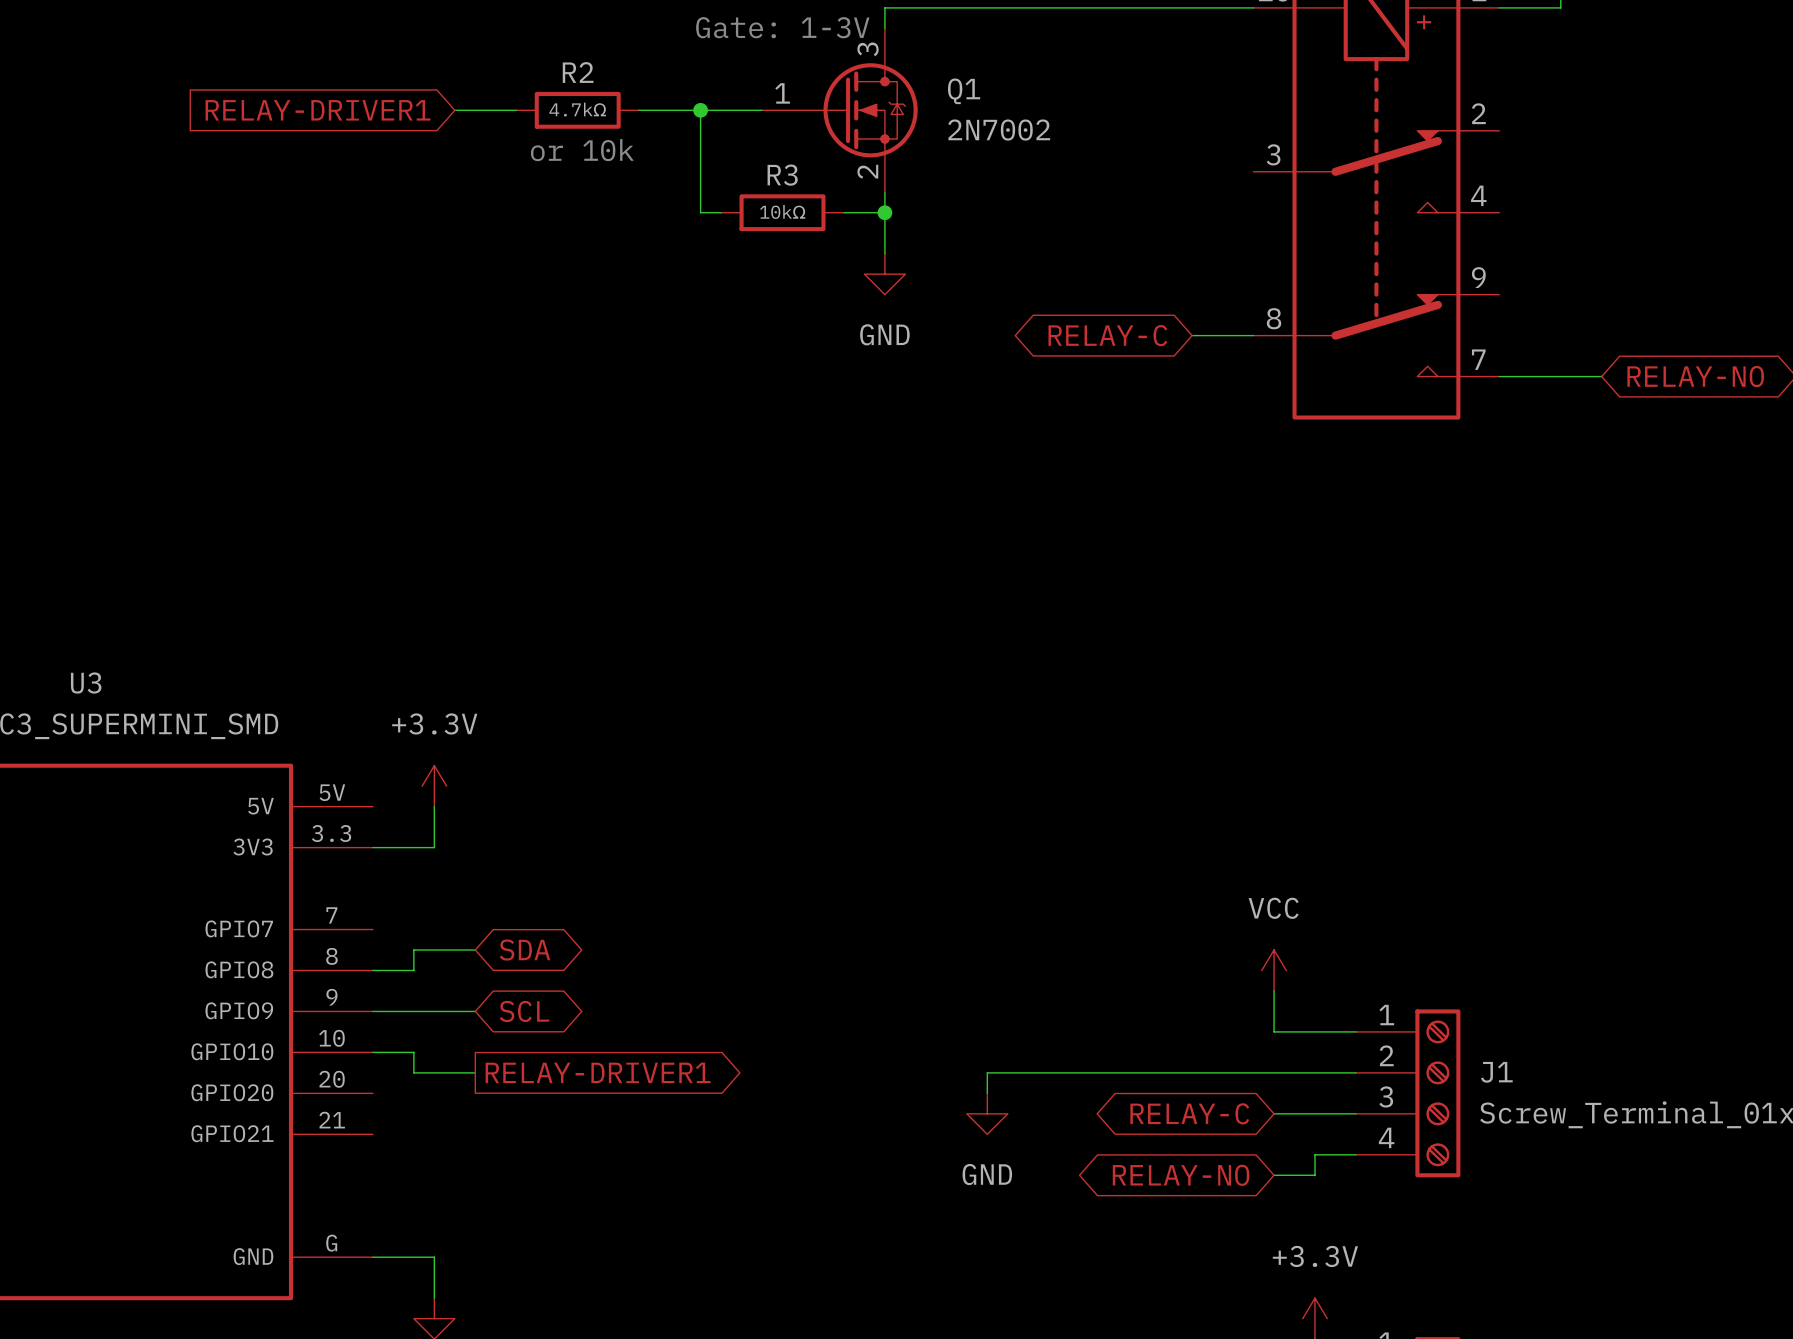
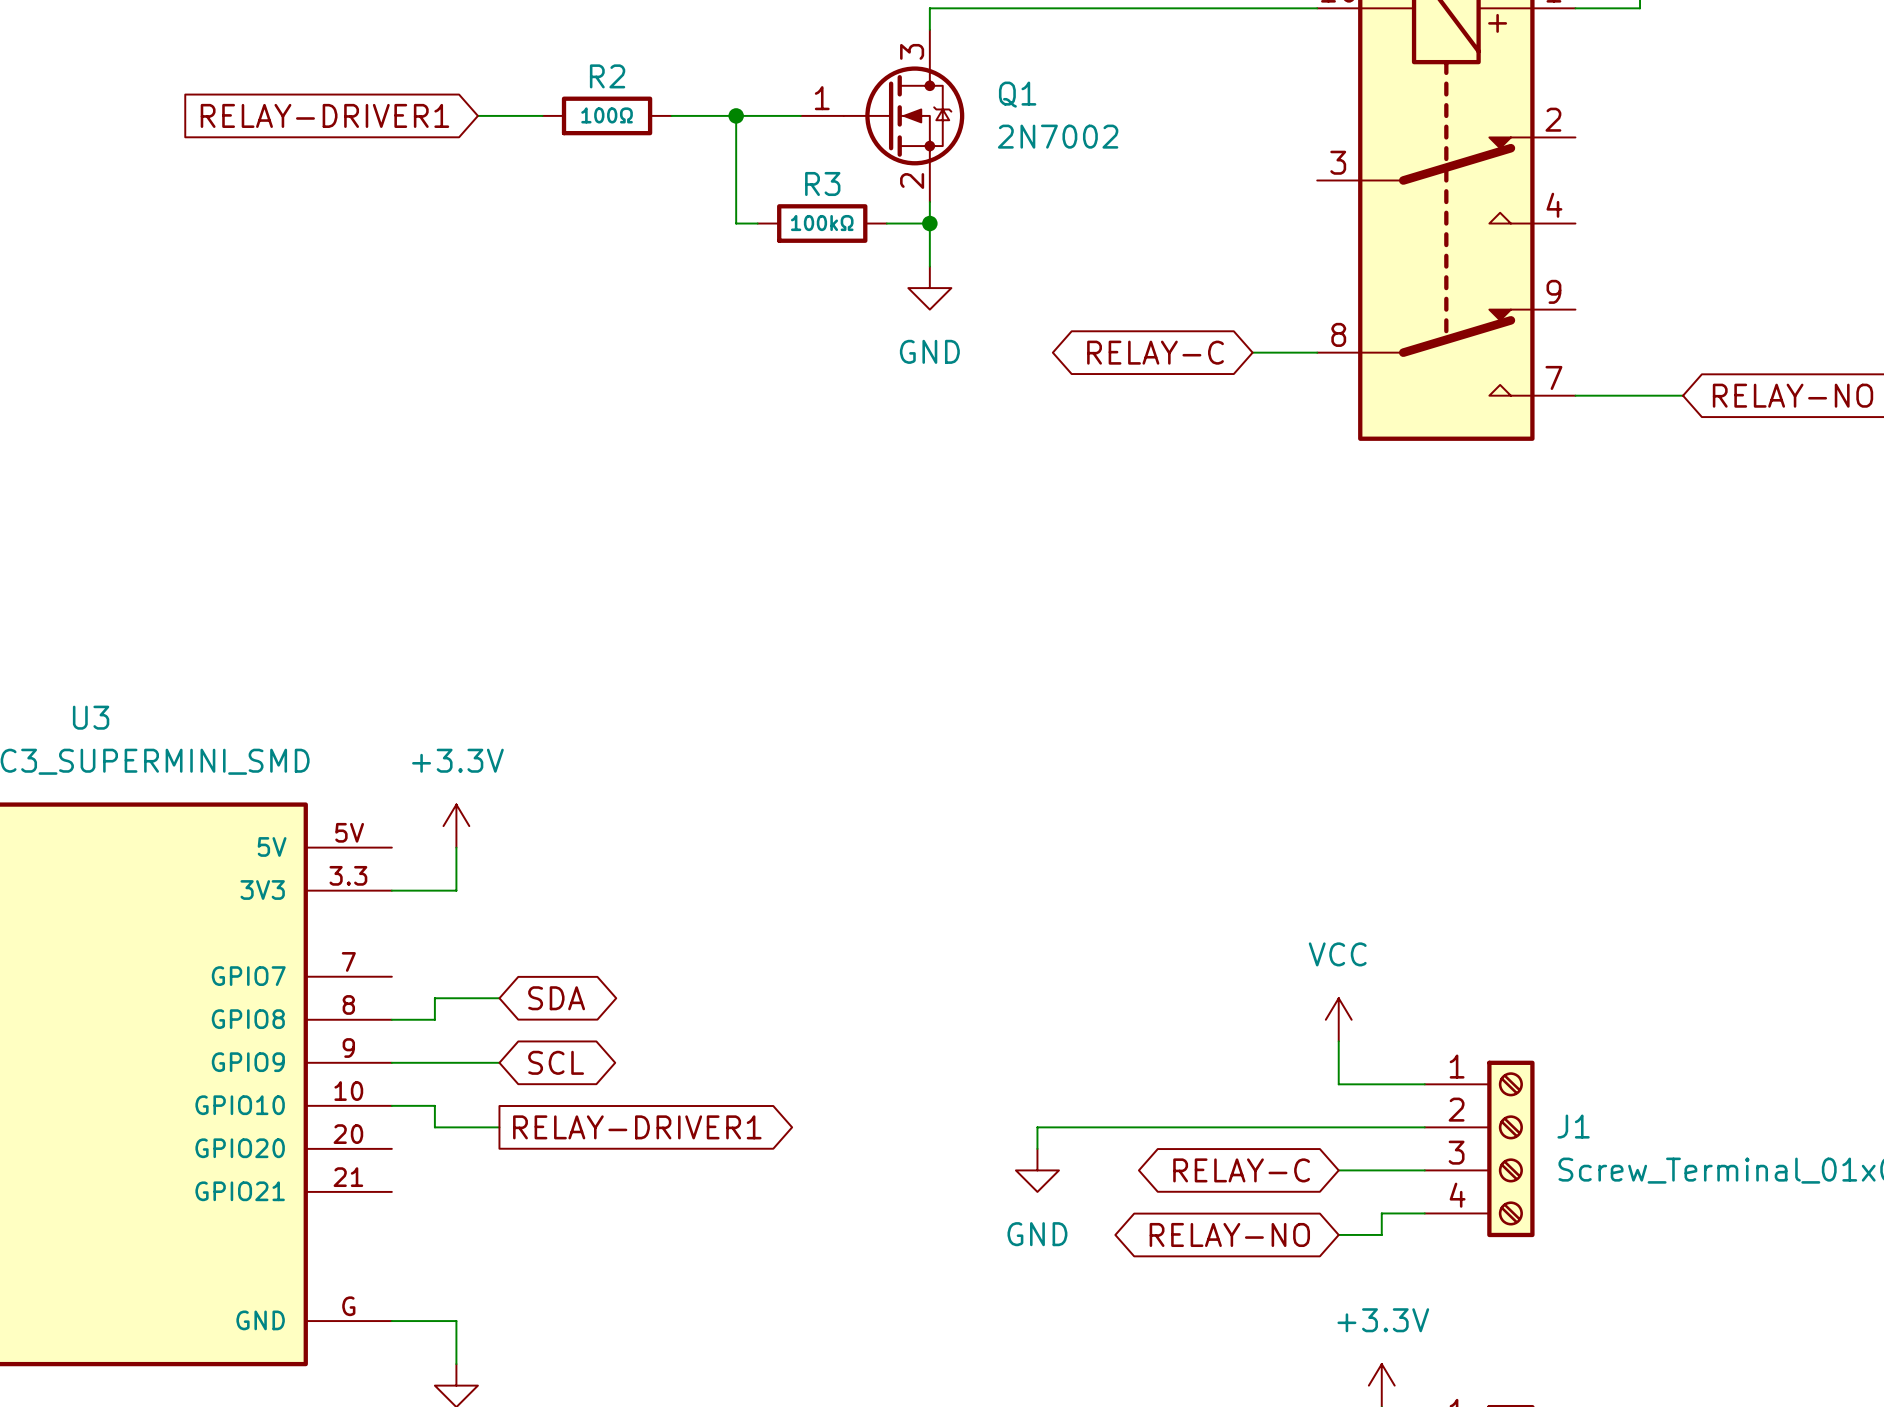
text: Gate: 1-3V (782, 27) -> none
R2 value: 4.7kΩ (577, 109) -> 100Ω (607, 115)
text: or 10k (582, 150) -> none
R3 value: 10kΩ (782, 211) -> 100kΩ (822, 223)

